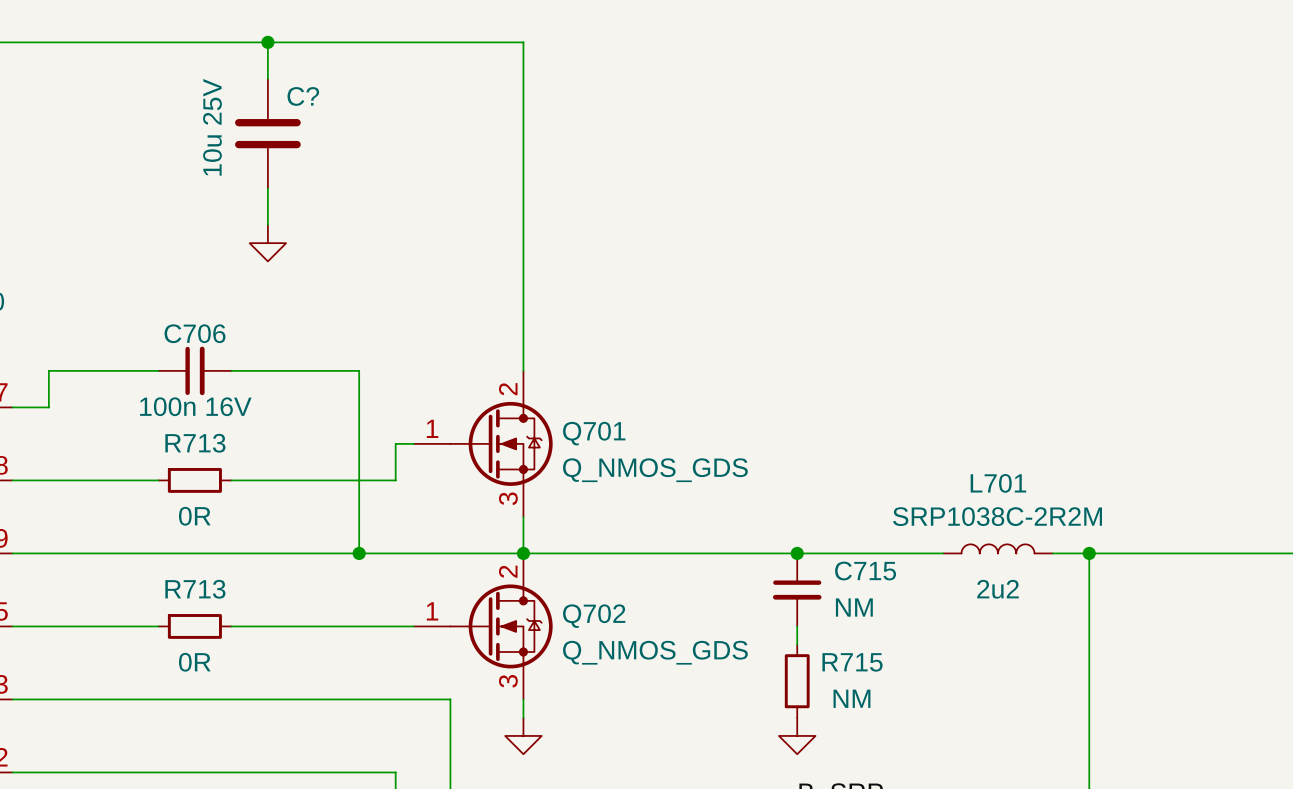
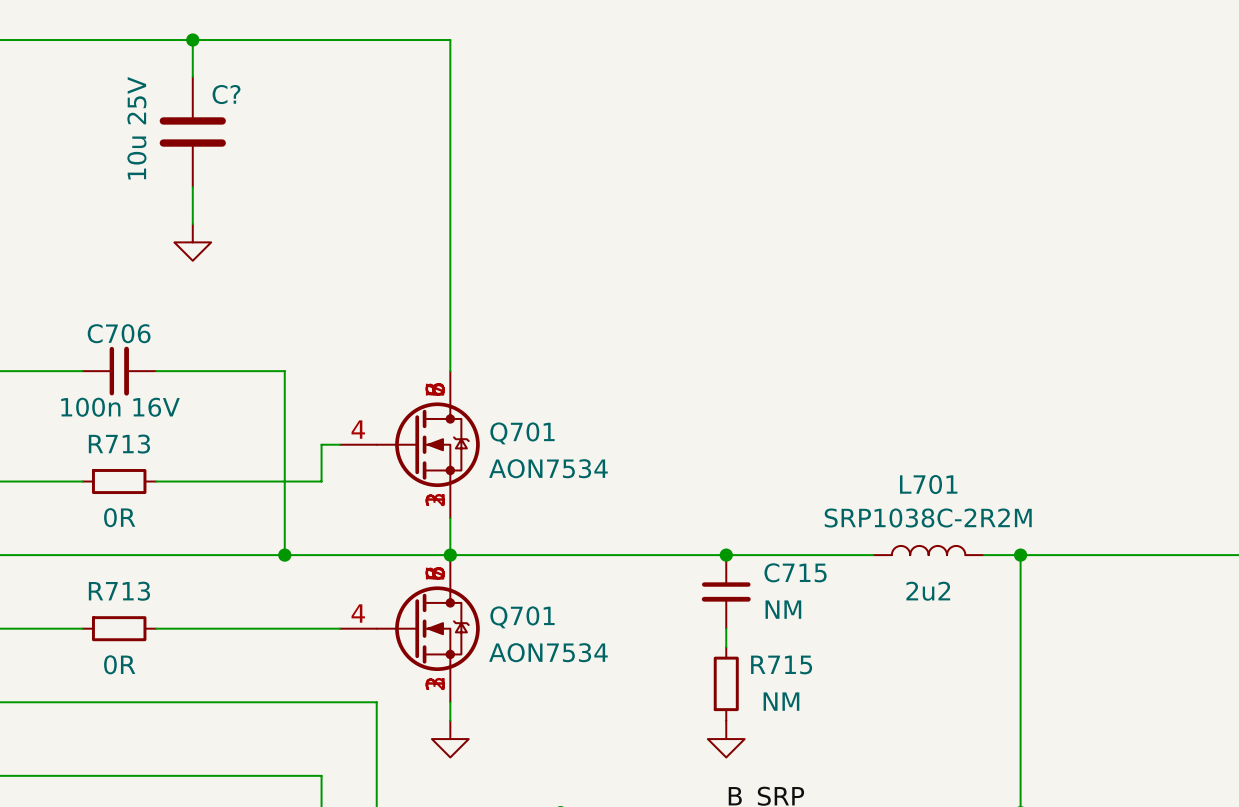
Q701 symbol: [413, 370, 553, 517] -> [339, 371, 480, 519]
Q701 value: Q_NMOS_GDS (655, 470) -> AON7534 (548, 468)
Q702 symbol: [413, 553, 553, 700] -> [339, 555, 480, 703]
Q702 name: Q702 (594, 616) -> Q701 (522, 617)
Q702 value: Q_NMOS_GDS (655, 652) -> AON7534 (548, 652)

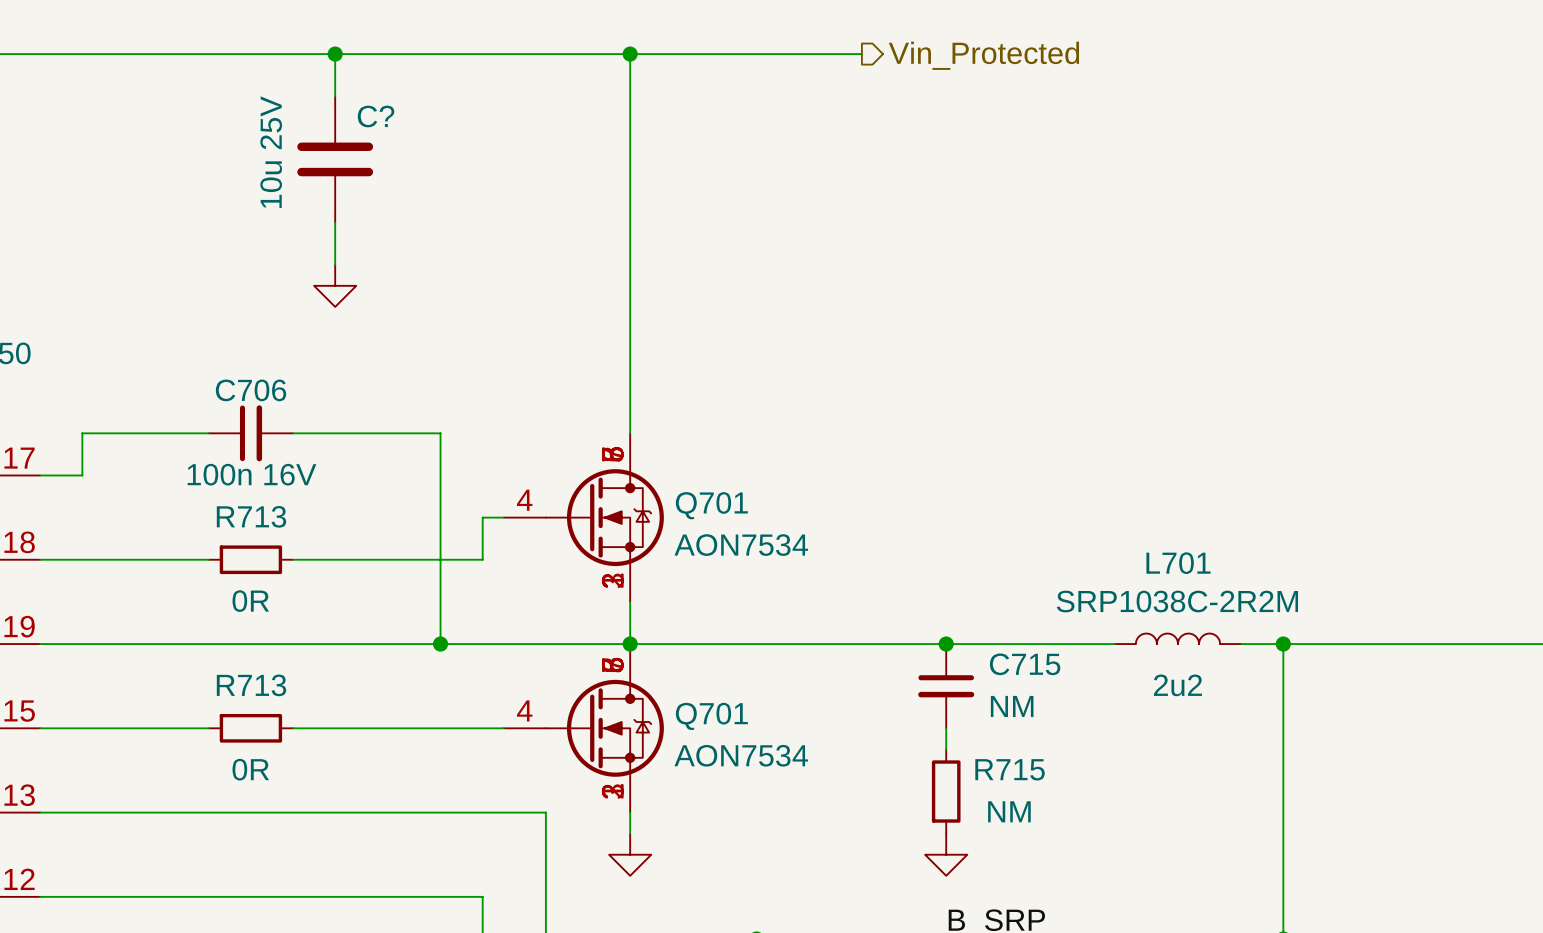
wire: none -> (630, 54) (861, 54)
junction: none -> (630, 54)
hierarchical label: none -> Vin_Protected (983, 55)

